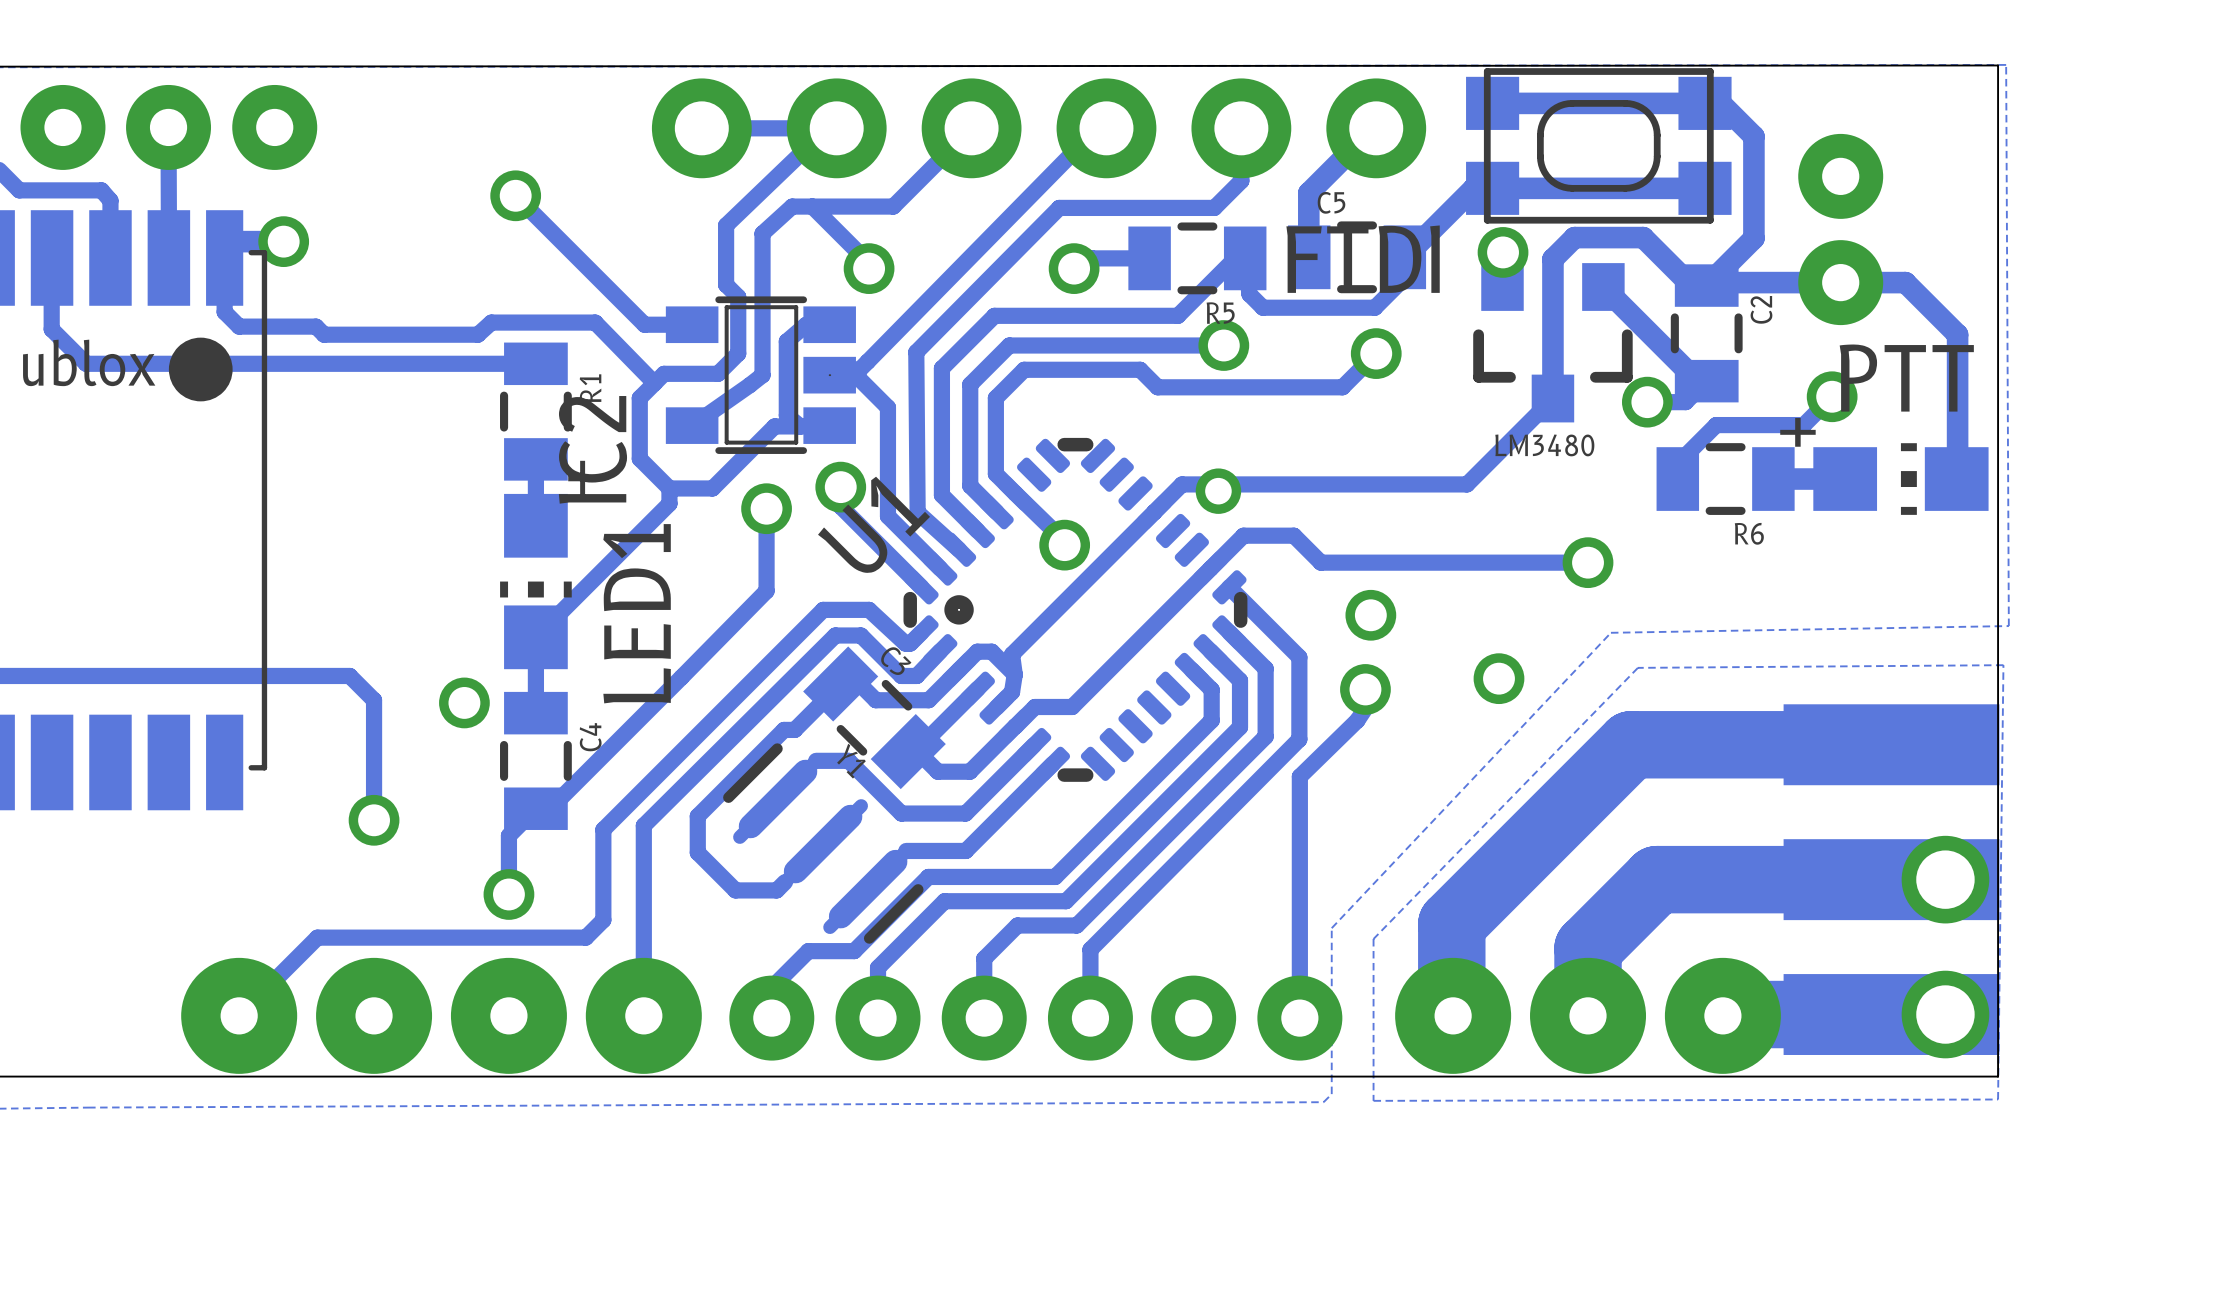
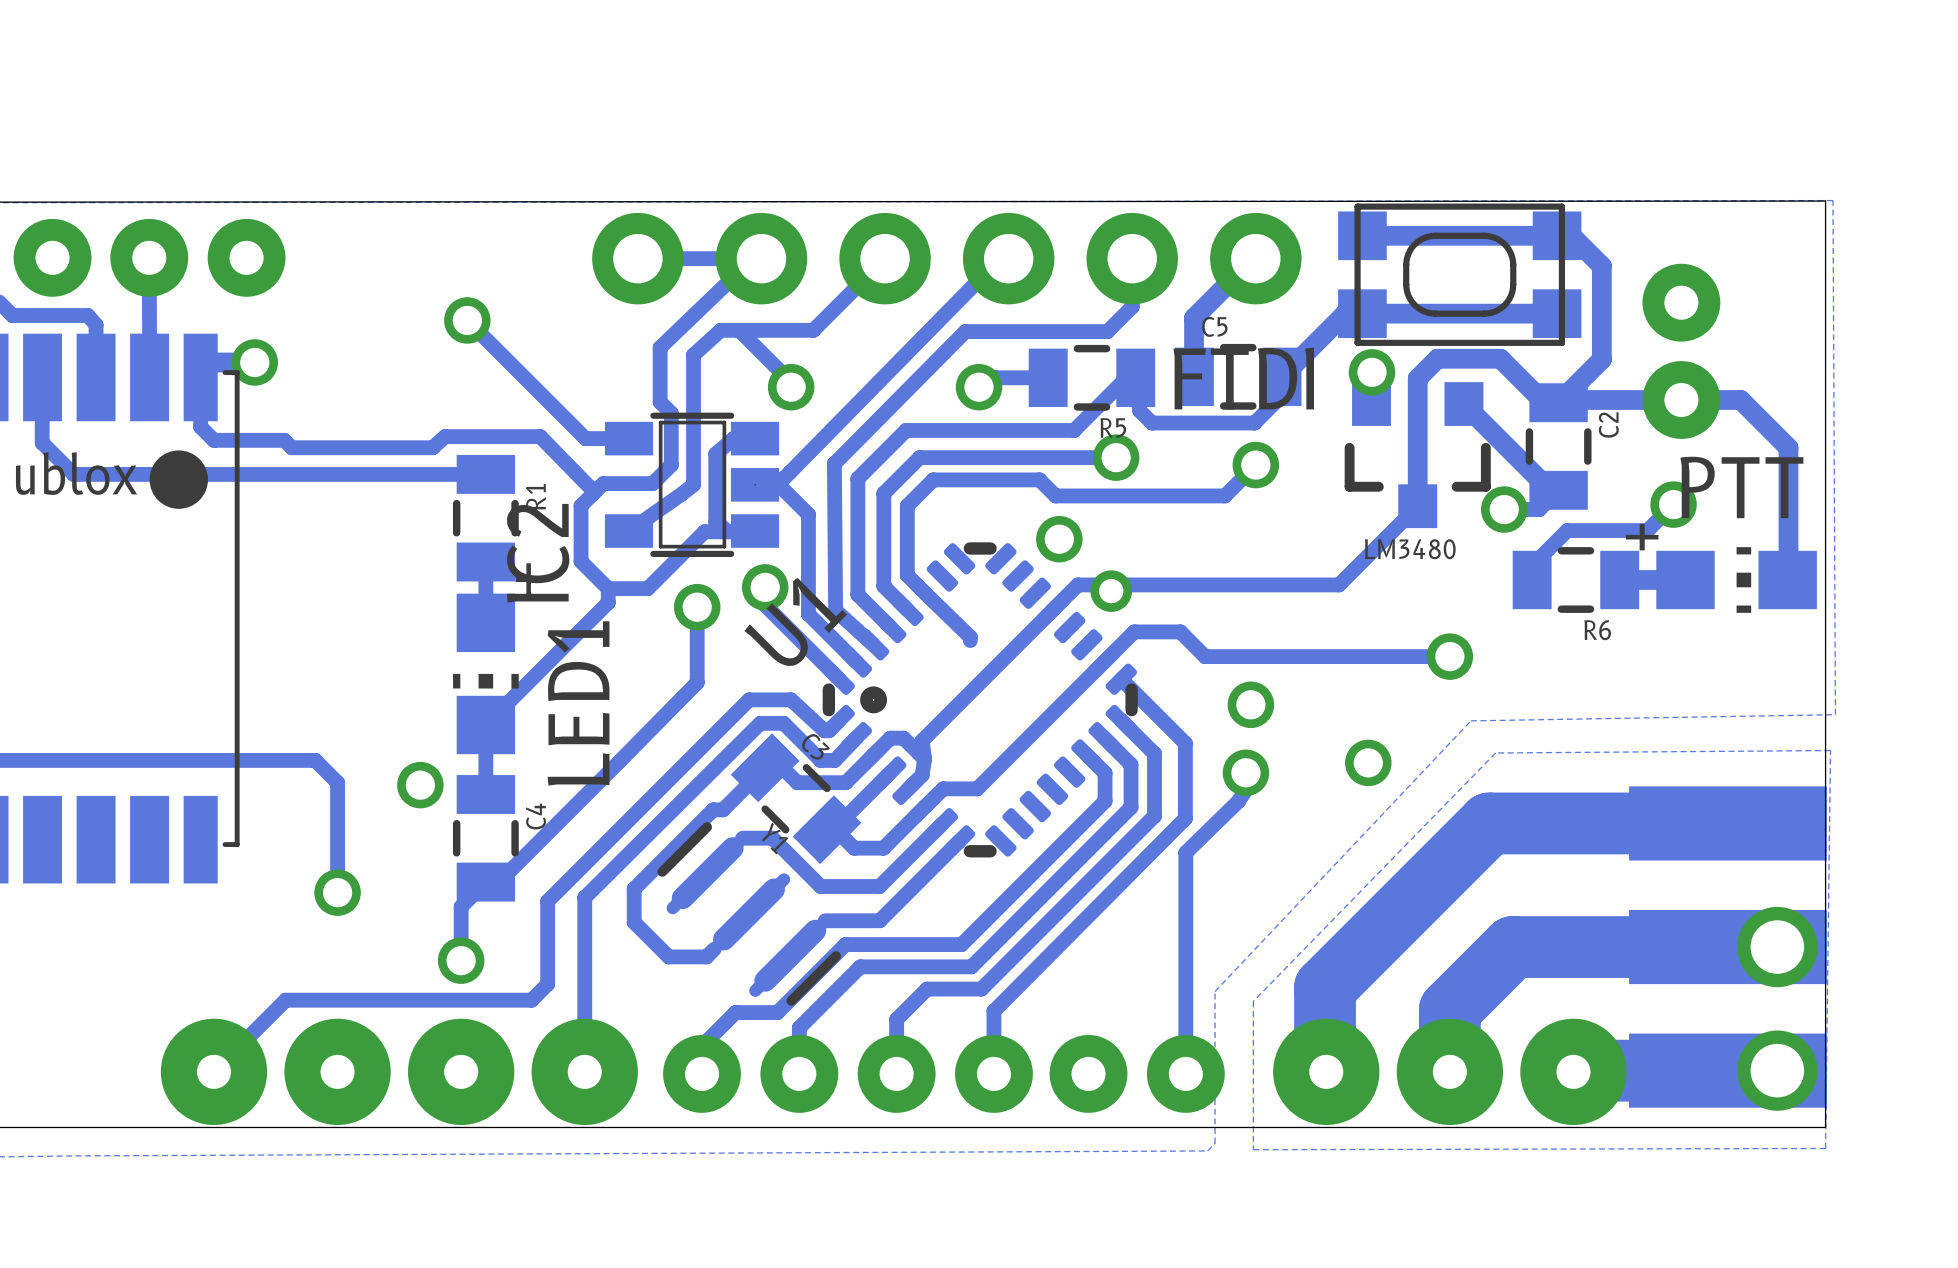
via position: (1064, 545) -> (1059, 539)

